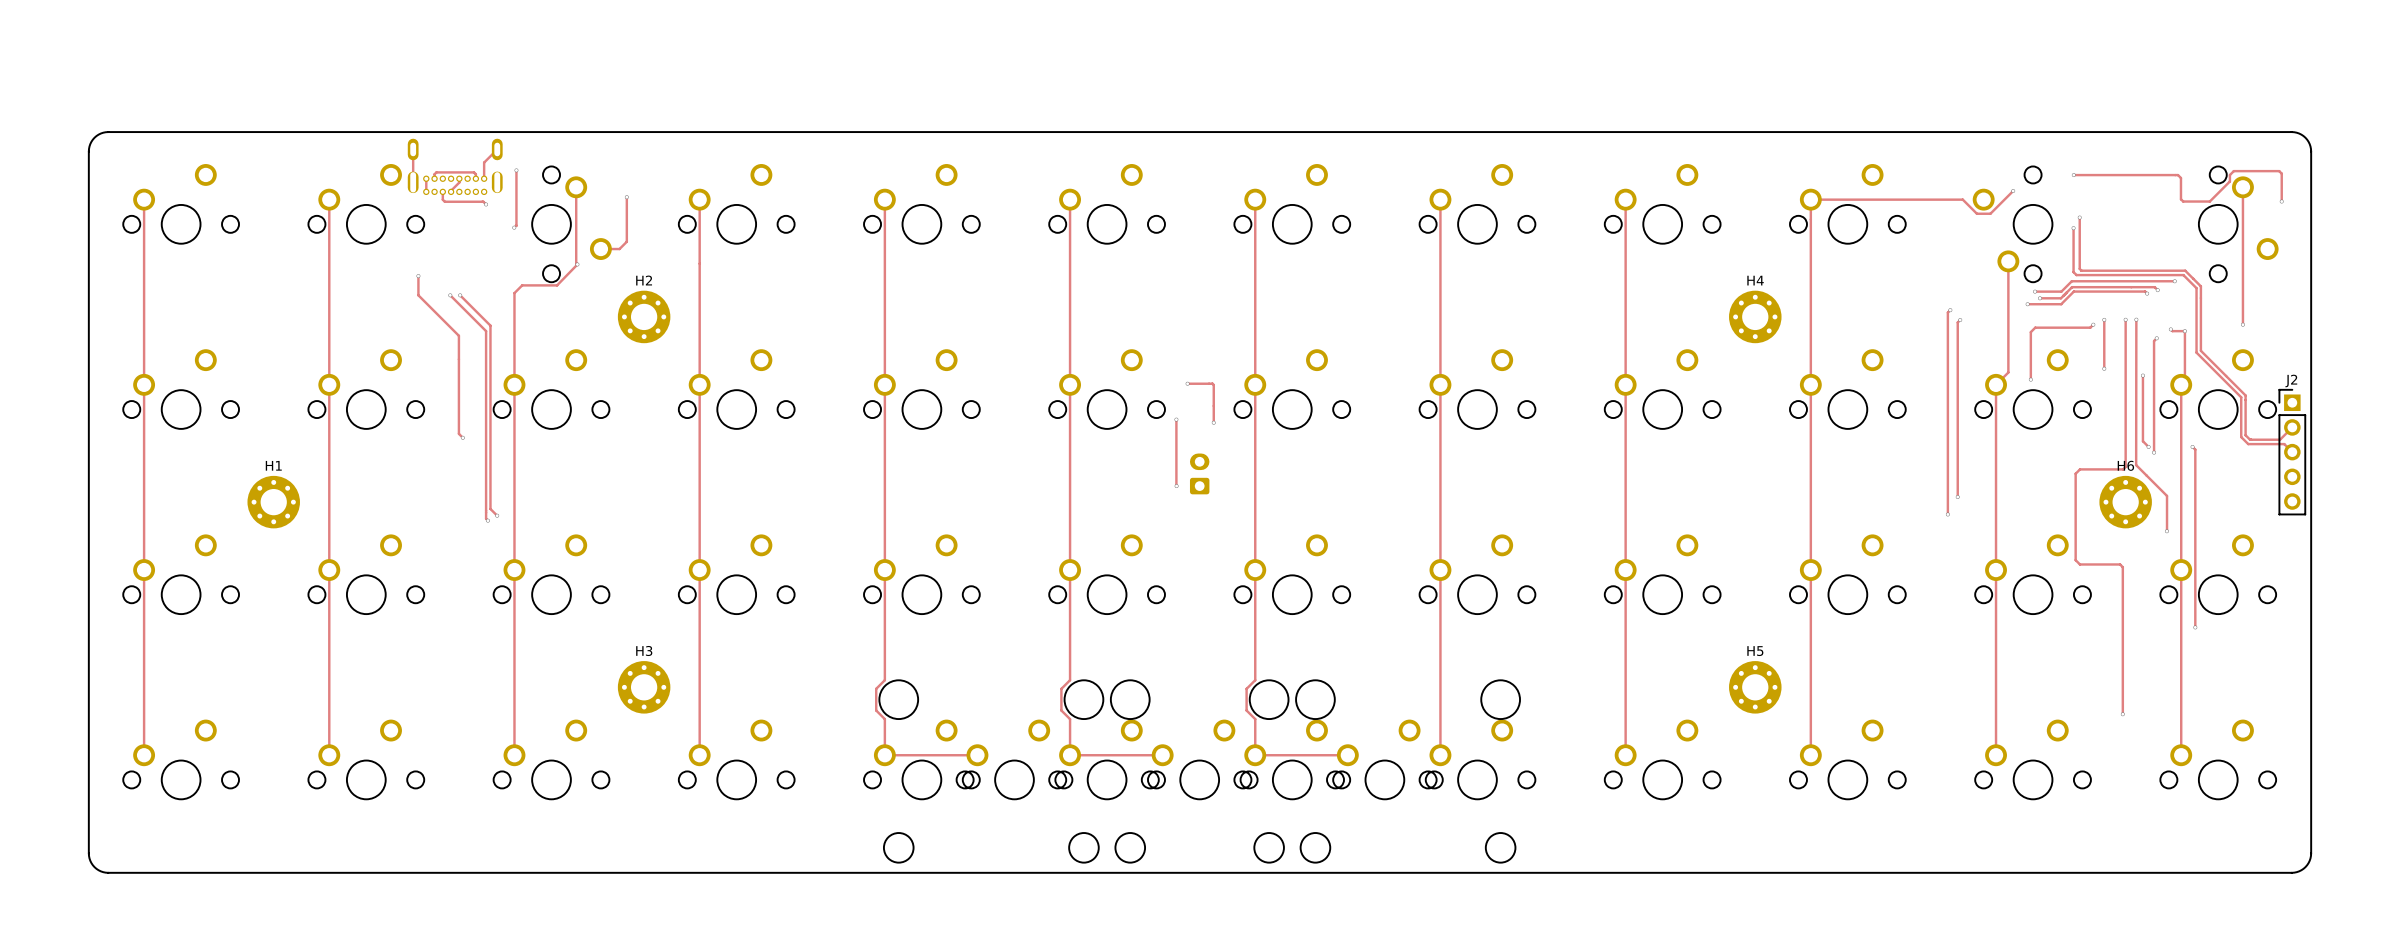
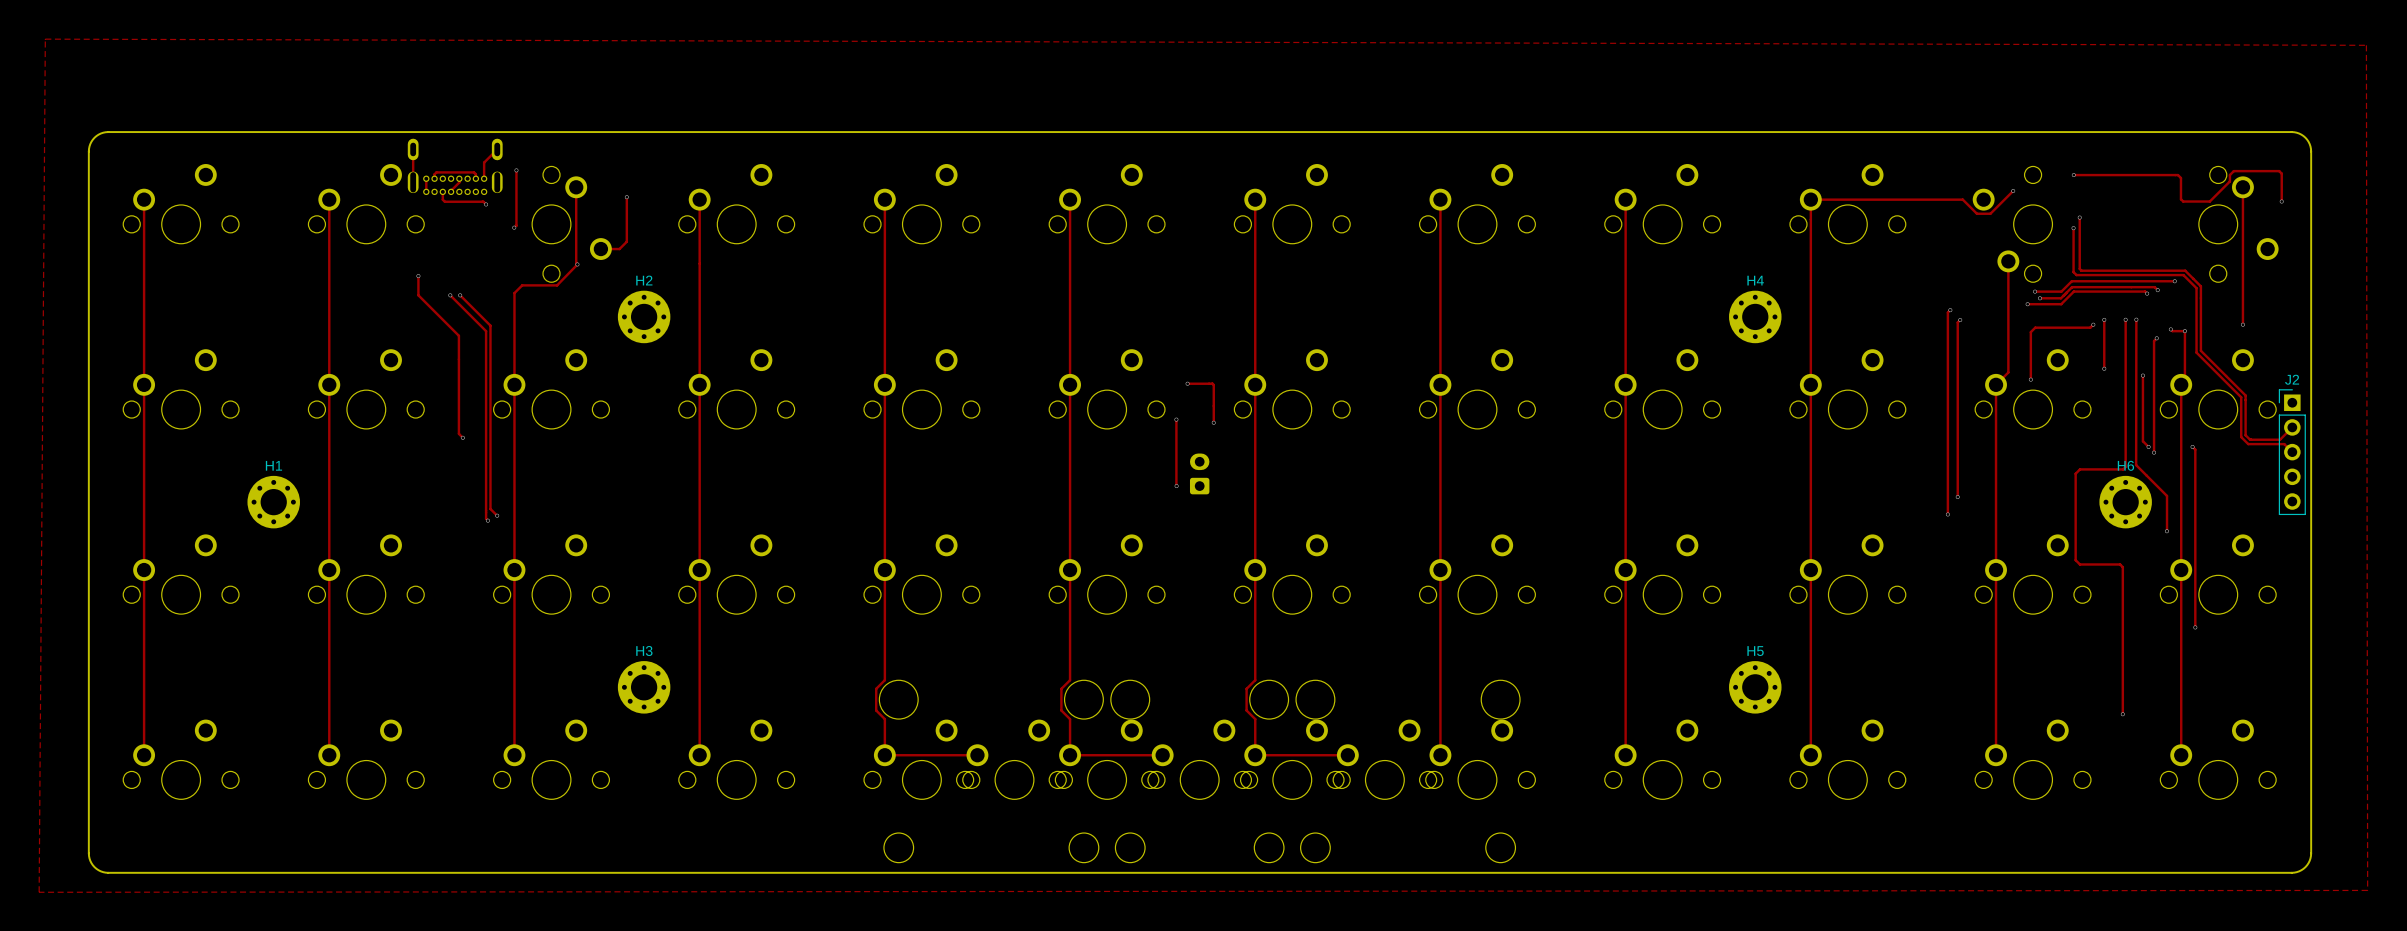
zone outline: none -> (45, 39) (39, 892) (2367, 890) (2366, 45) (45, 39)

